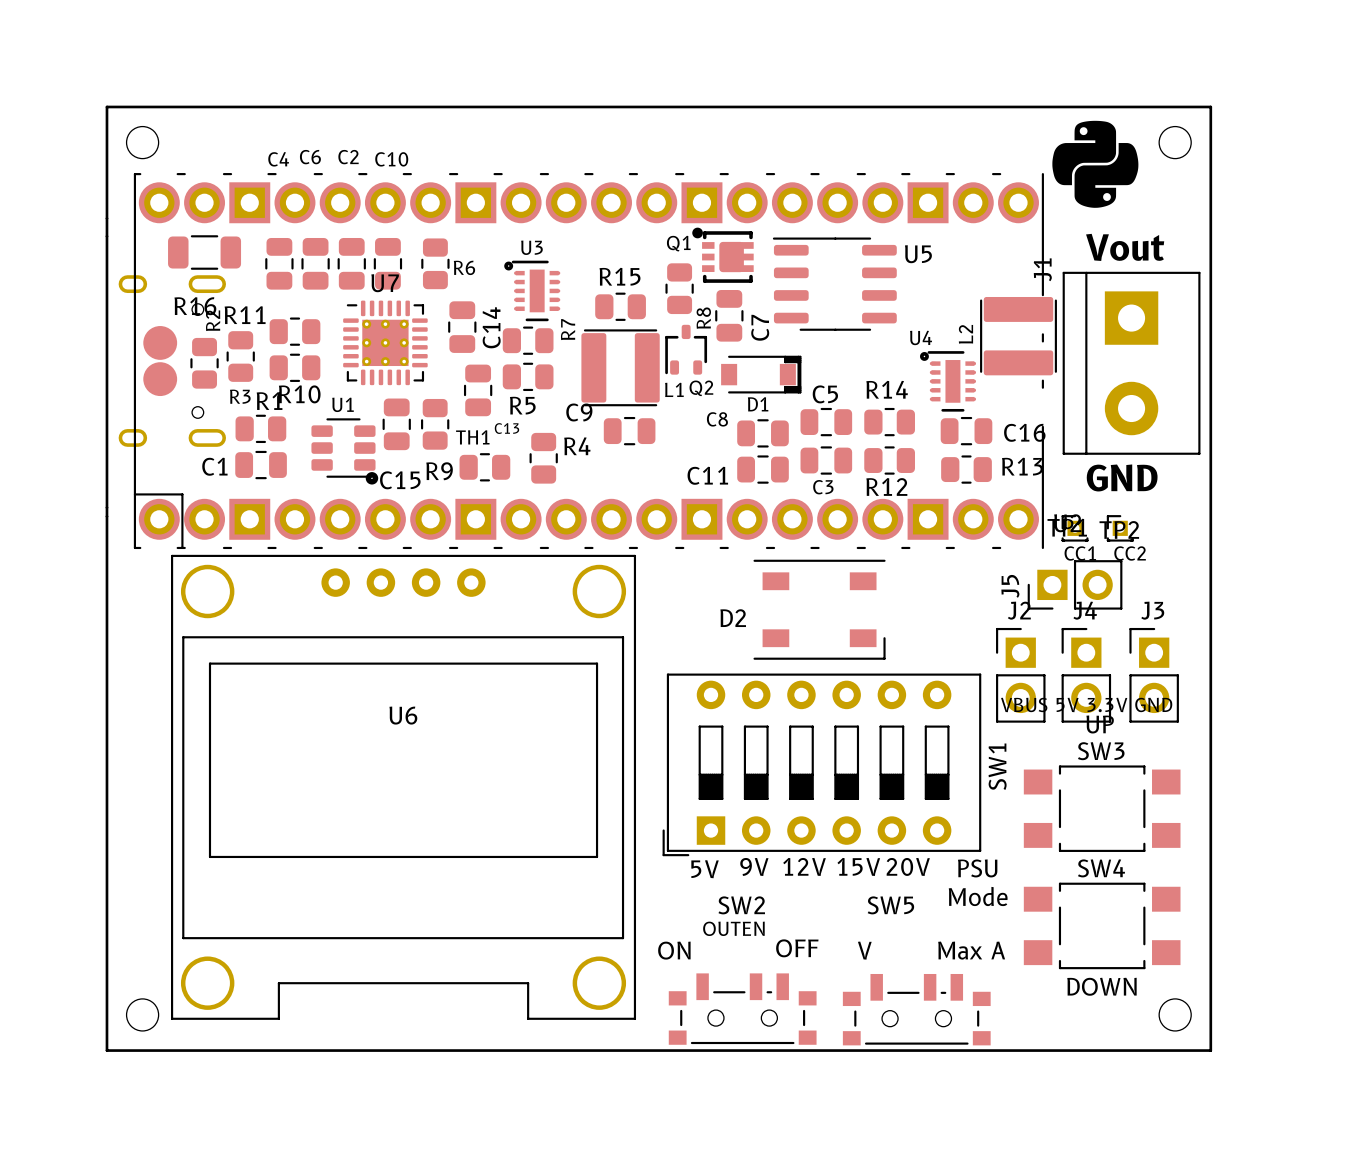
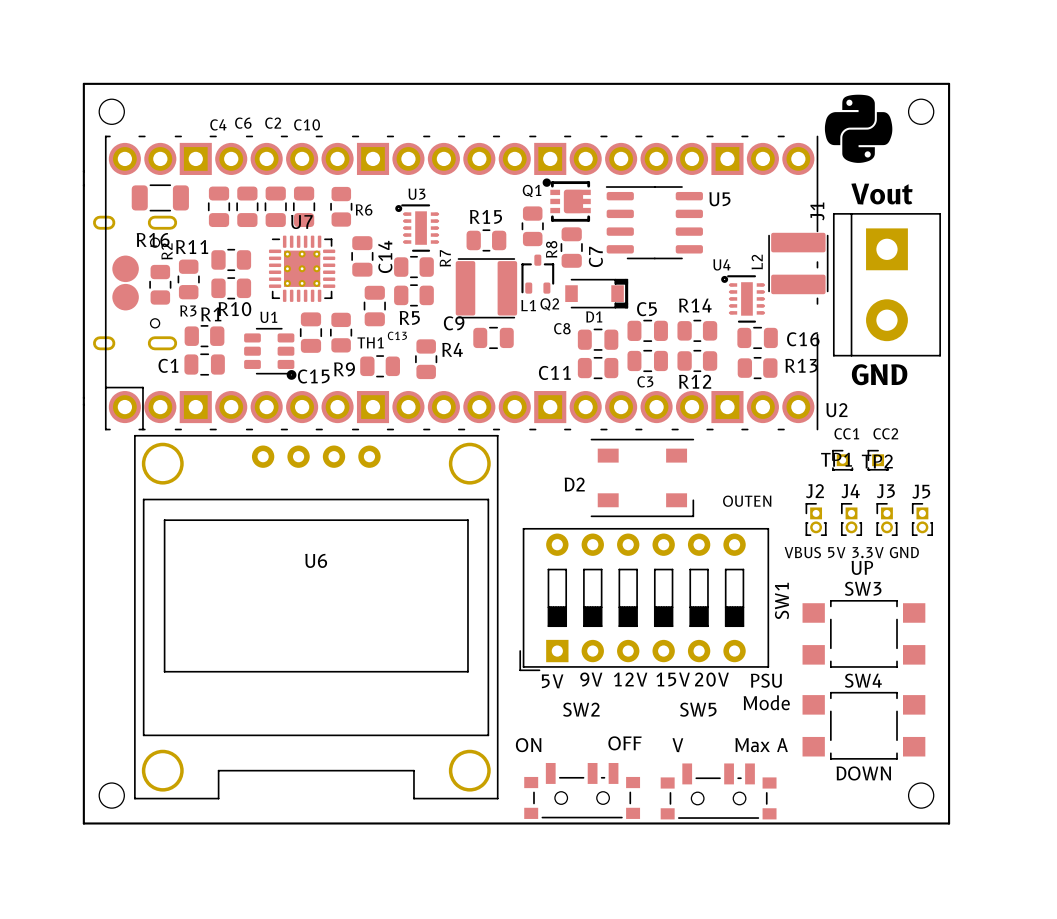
TP2 position: (1075, 528) -> (842, 460)
TP1 position: (1120, 528) -> (878, 460)
J5 footprint: [1027, 560, 1123, 610] -> [911, 503, 933, 537]
J5 name position: J5 (1010, 586) -> J5 (921, 491)
J2 footprint: [996, 627, 1046, 723] -> [805, 503, 827, 537]
J4 footprint: [1061, 627, 1112, 723] -> [840, 503, 863, 537]
J3 footprint: [1129, 627, 1179, 723] -> [876, 503, 898, 537]
text position: OUTEN (733, 928) -> OUTEN (747, 501)

